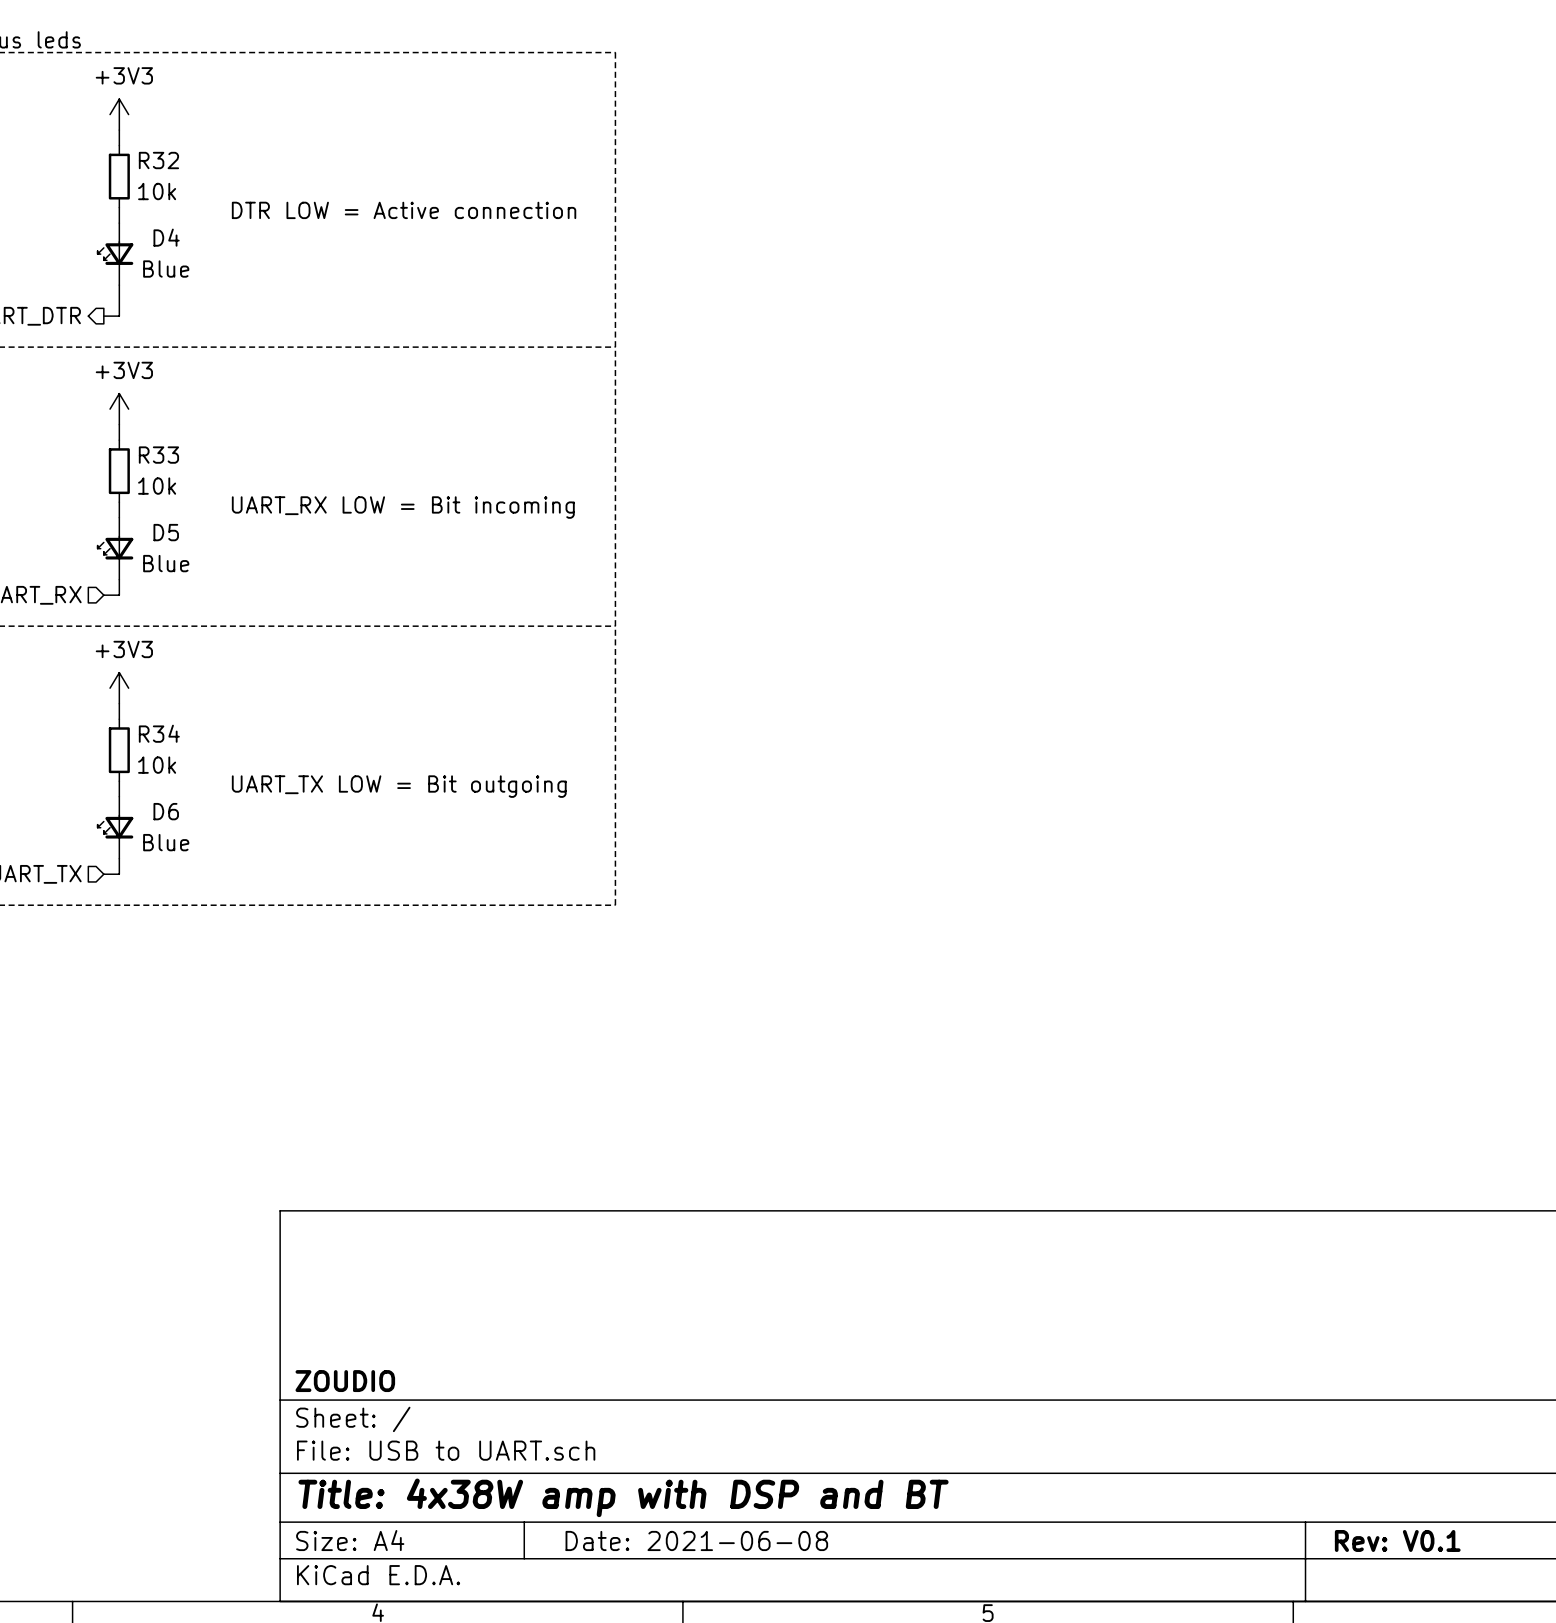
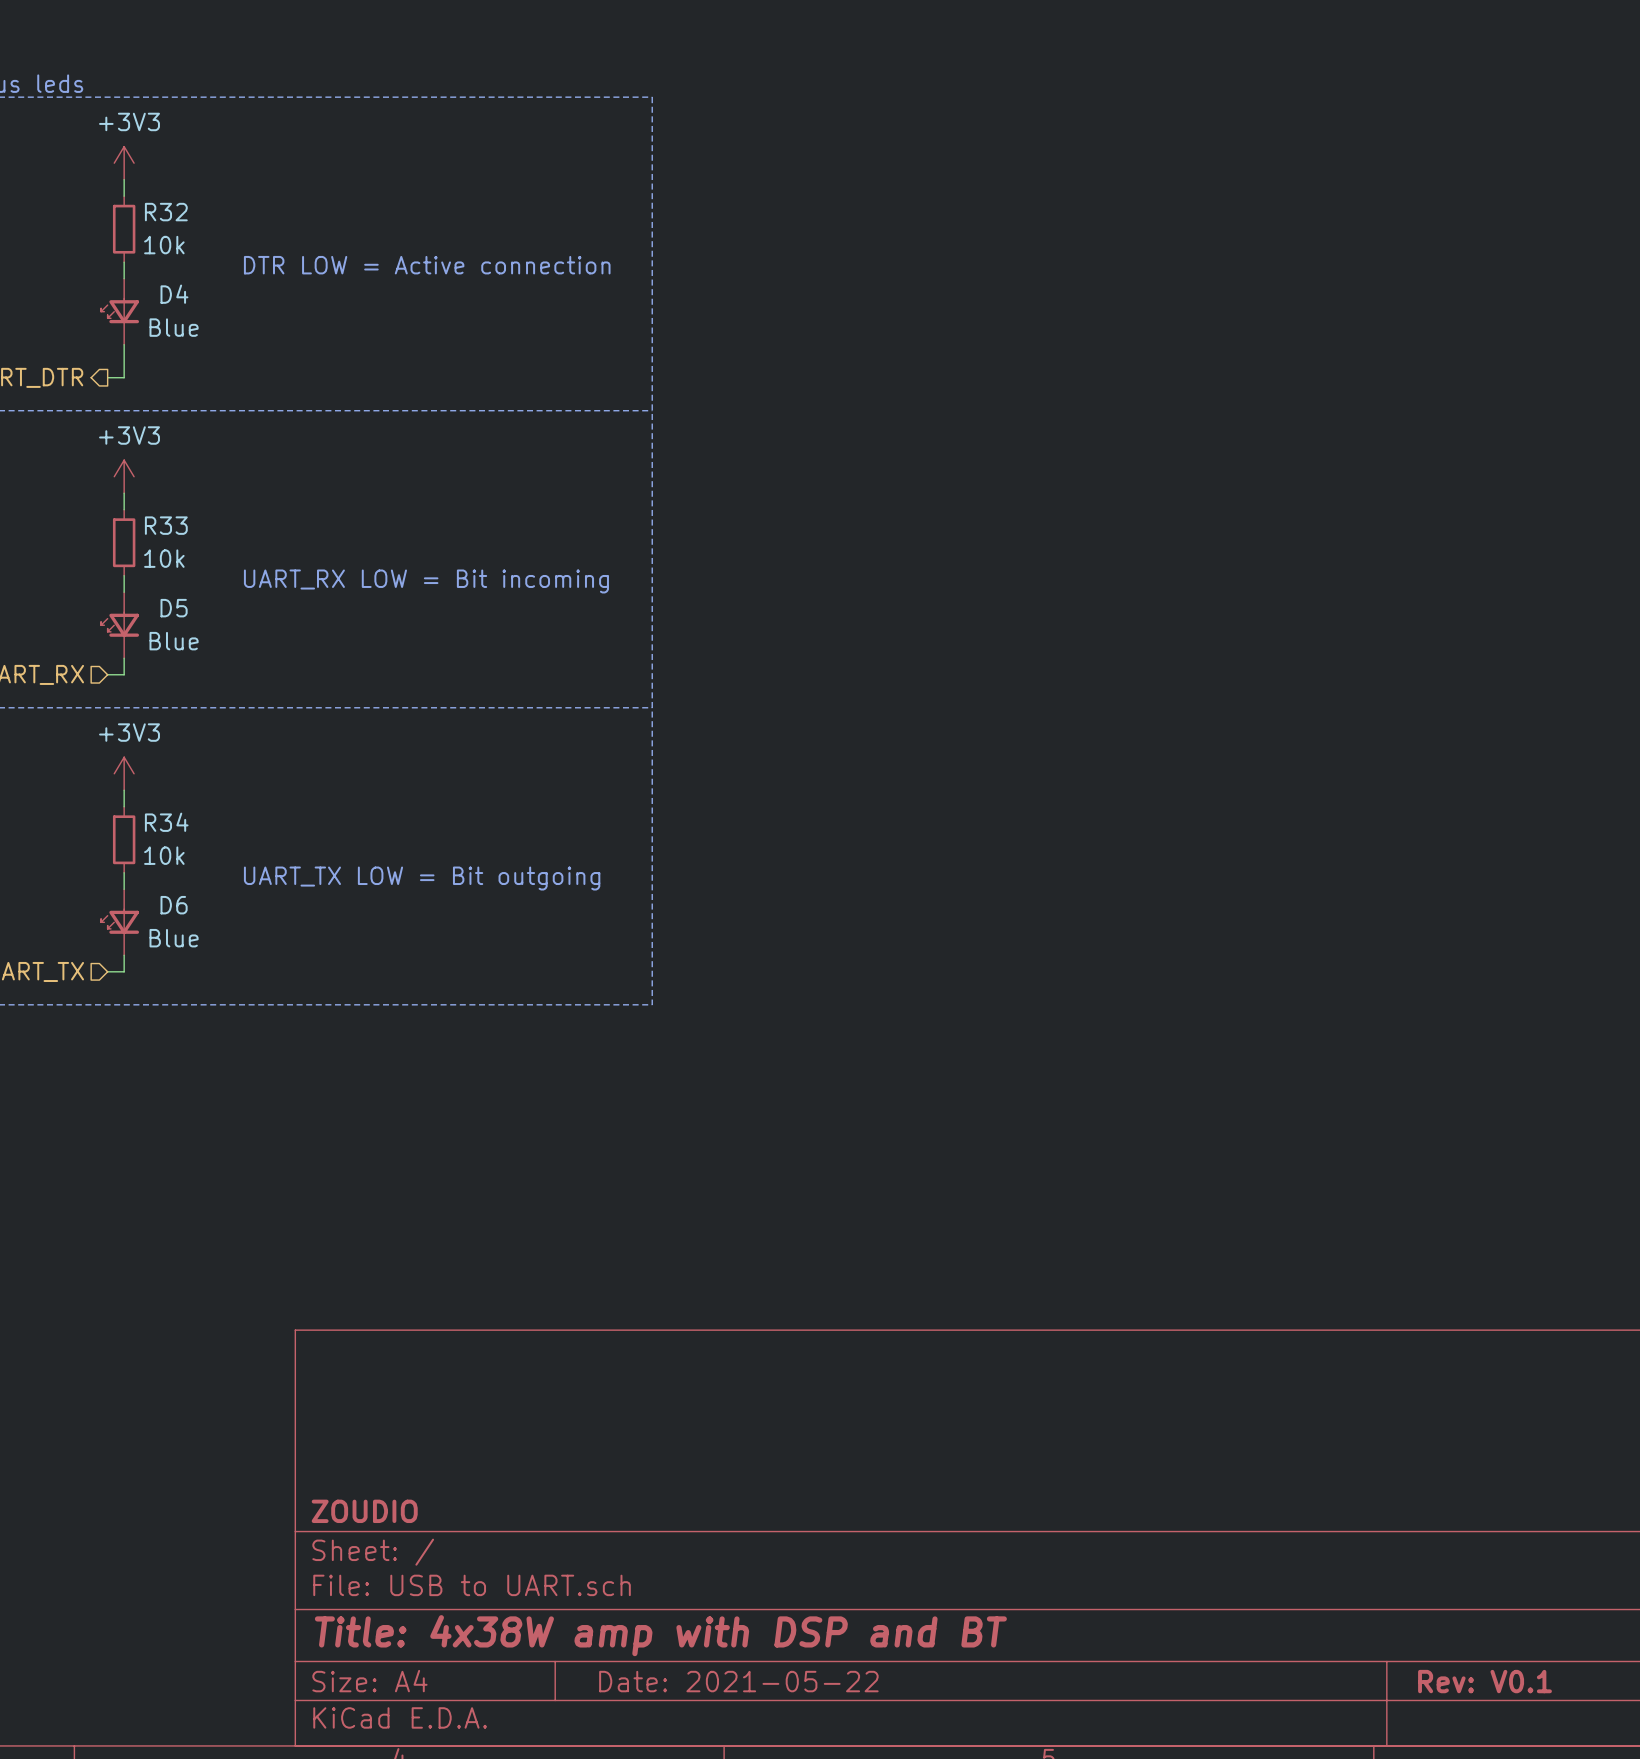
title block: Date: 2021-06-08 (696, 1540) -> Date: 2021-05-22 (738, 1681)

